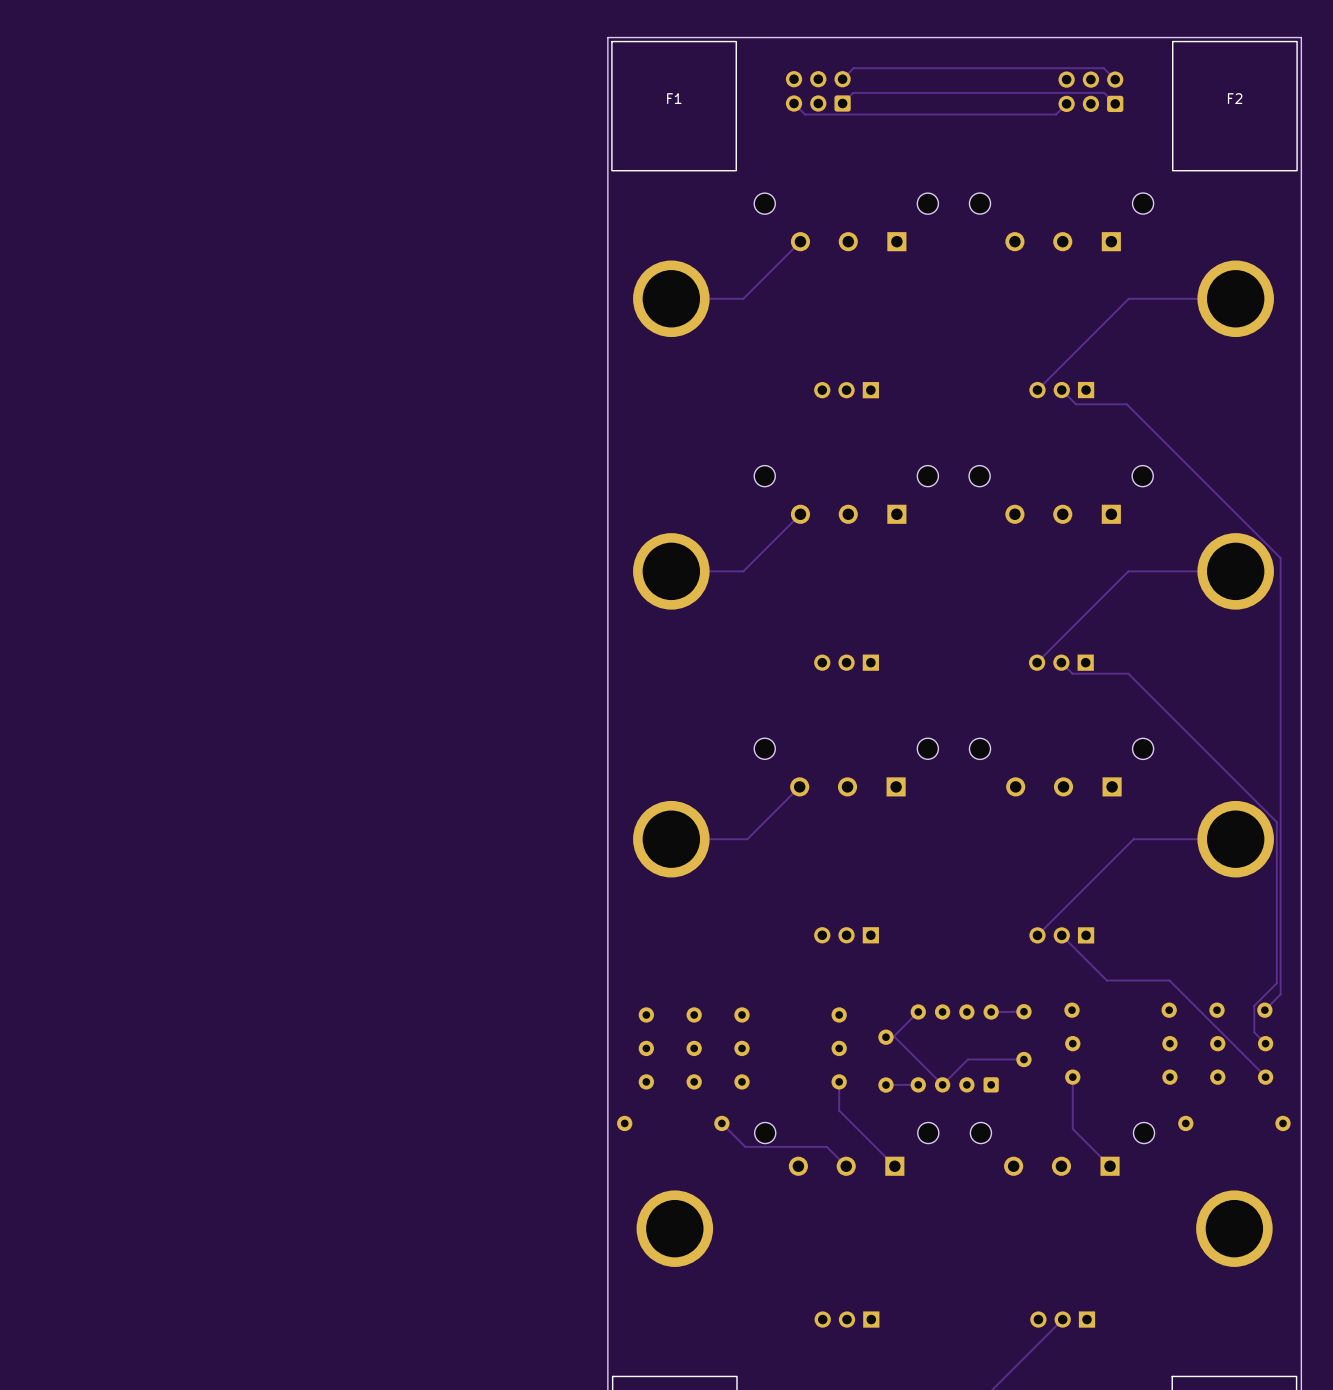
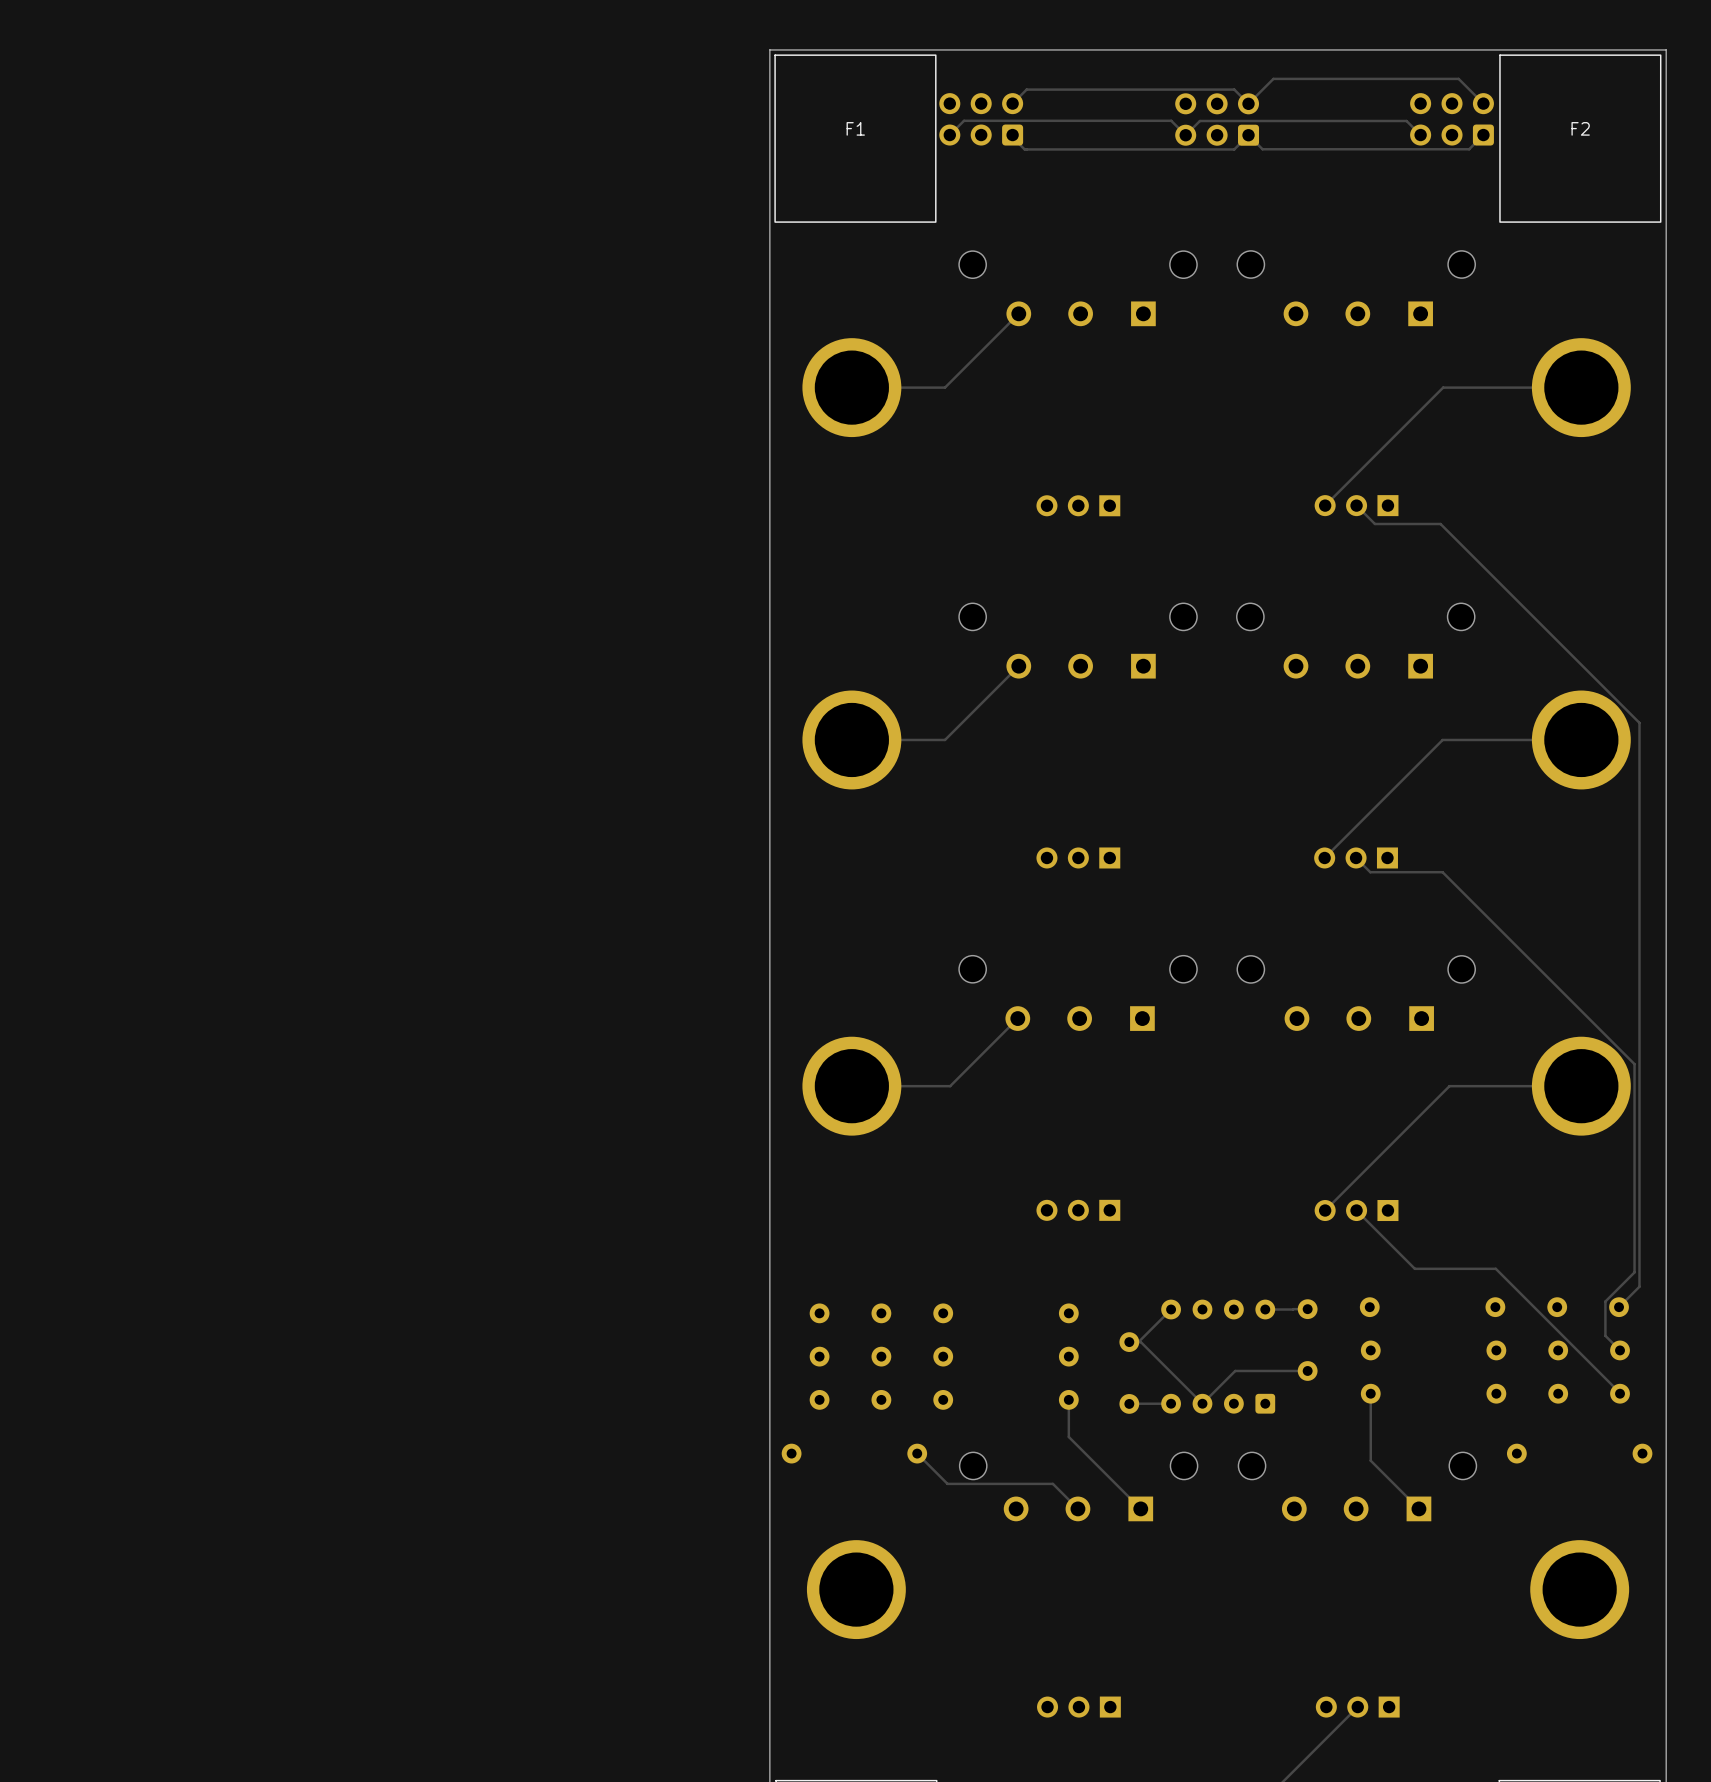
track: (853, 68) (842, 79) -> (1087, 89) (1026, 89) (1012, 103)
track: (967, 68) (1103, 68) (1115, 79) -> (1234, 89) (1248, 103) (1273, 78) (1458, 78) (1483, 103)
part position: (818, 91) -> (981, 119)
part: none -> (1217, 119)
part position: (1090, 91) -> (1452, 119)
track: (842, 103) (853, 92) (1104, 92) (1115, 103) -> none
track: (1066, 103) (1055, 114) (967, 114) -> (1483, 135) (1469, 149) (1262, 149) (1248, 135) (1234, 149)
track: none -> (1420, 135) (1406, 120) (1199, 120) (1185, 135) (1171, 120) (964, 120) (949, 135)

